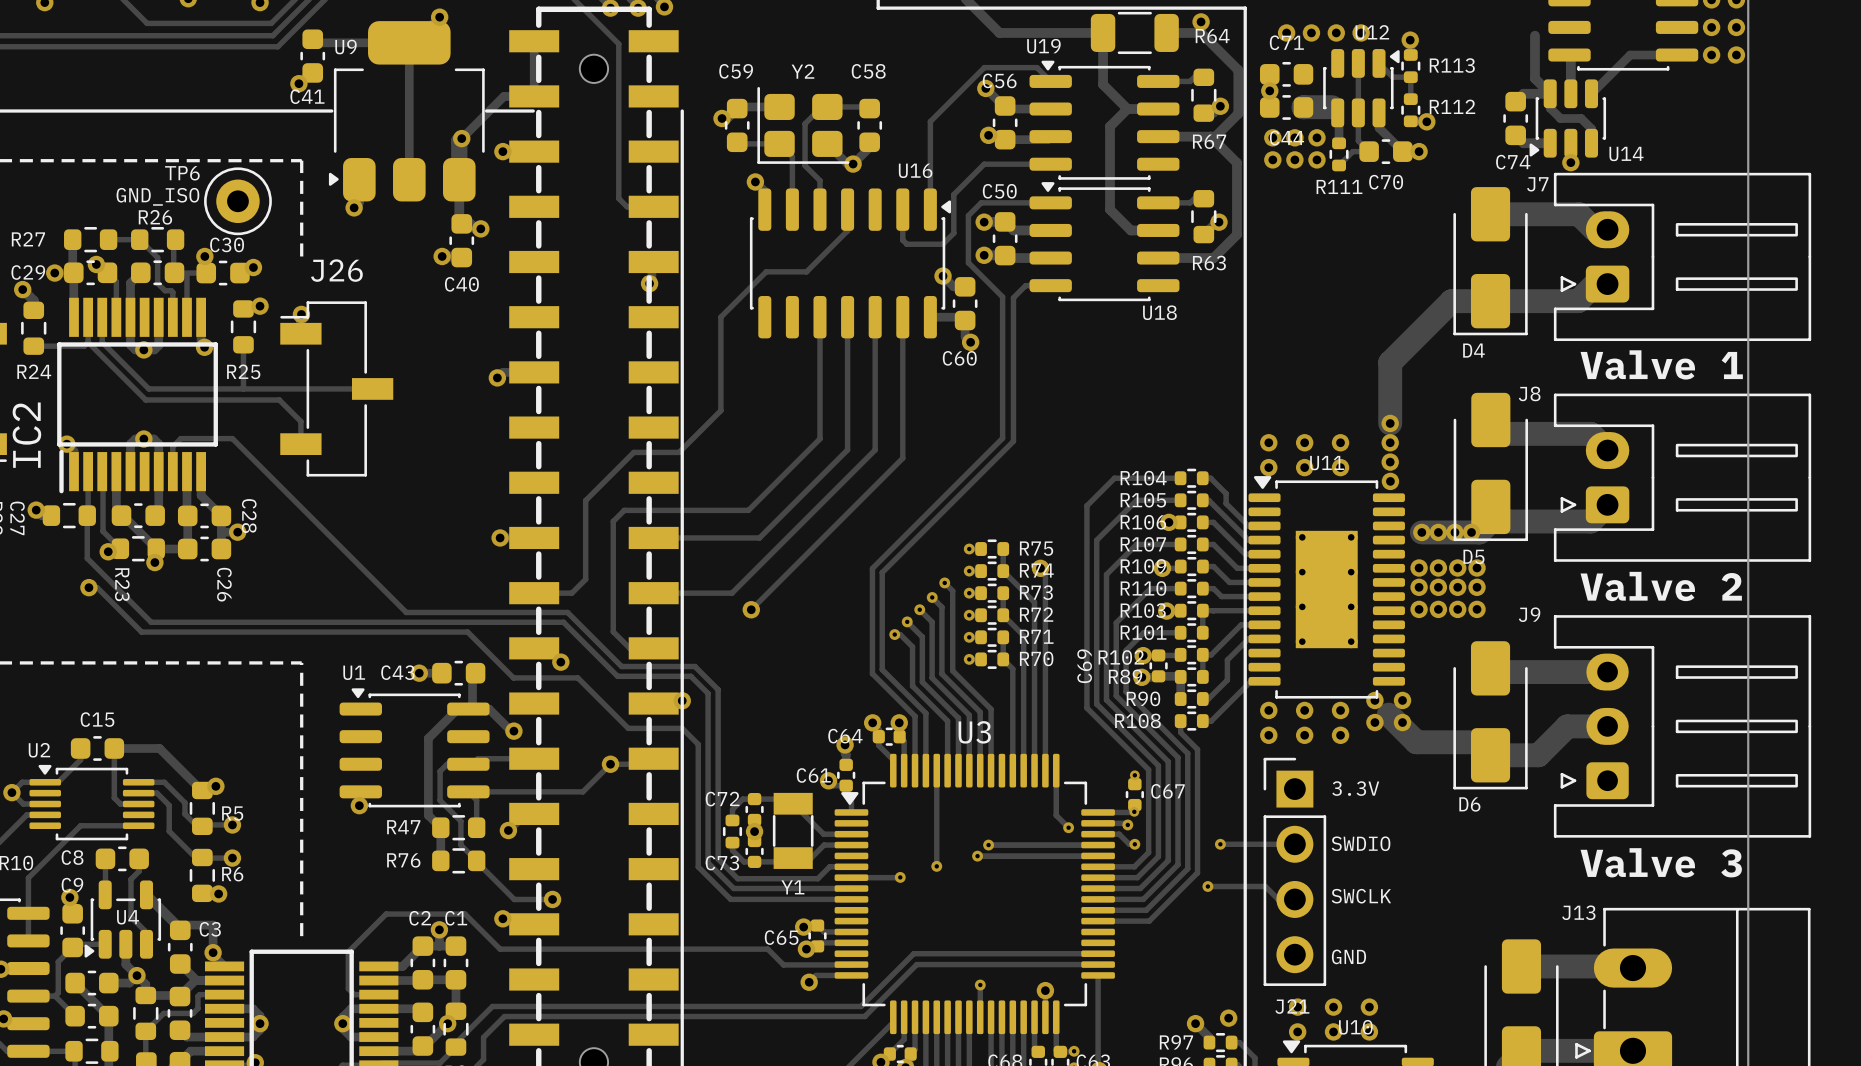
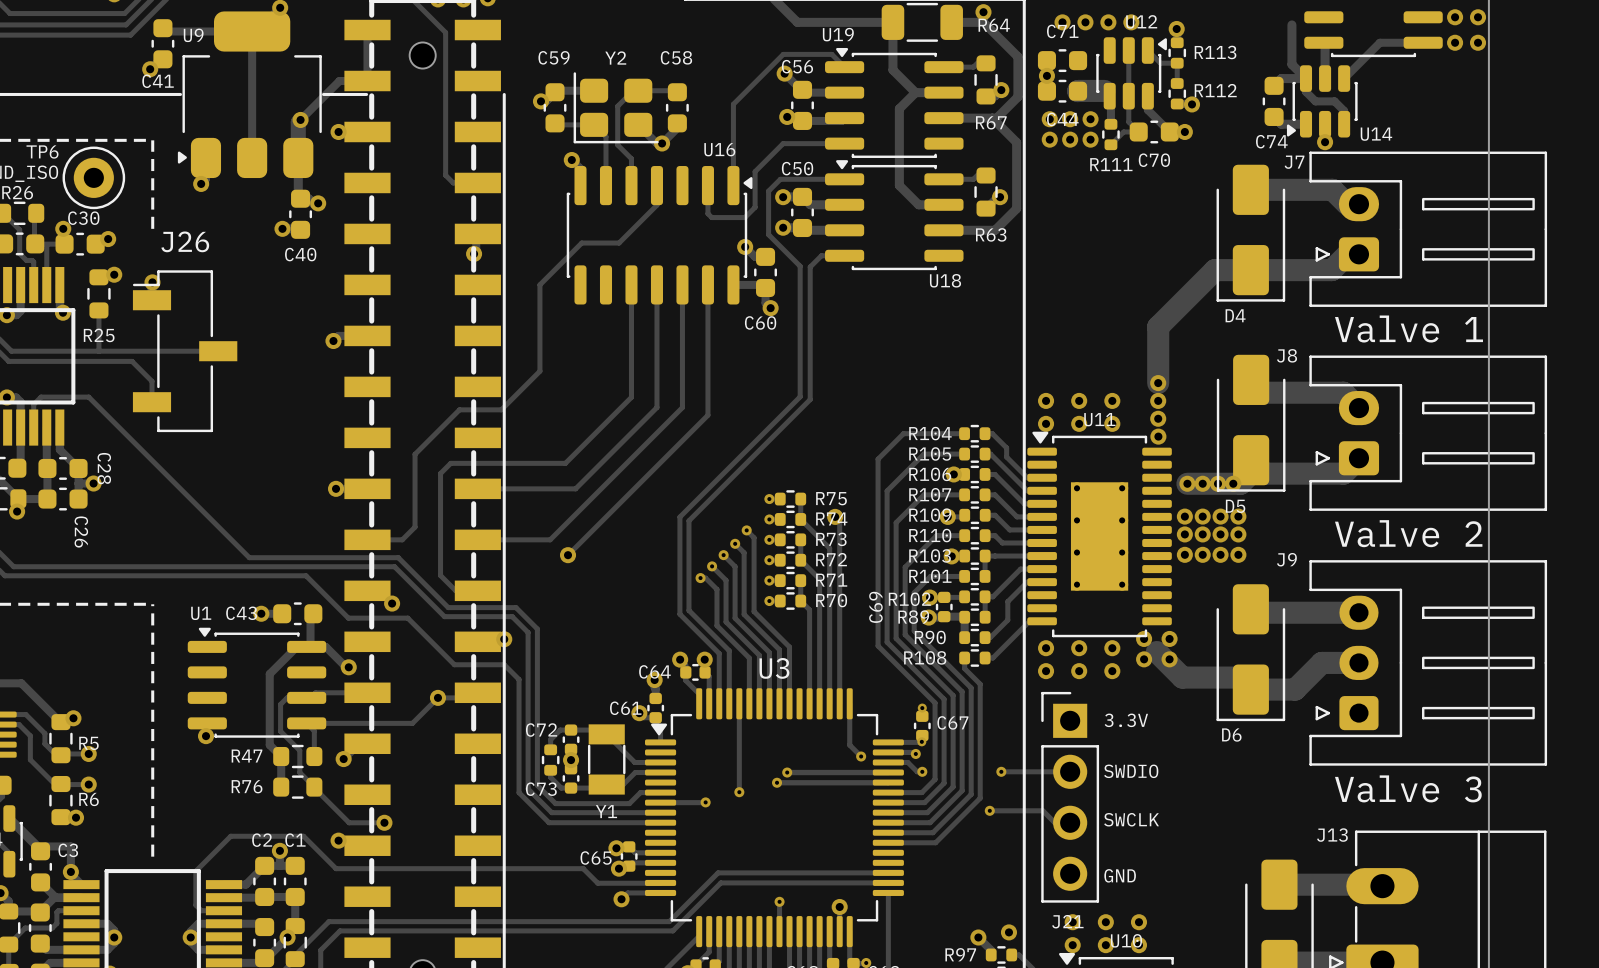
J7 text: none -> Valve 1 (1408, 329)
J7 value: Valve 1 (1661, 364) -> none
J8 text: none -> Valve 2 (1408, 533)
J8 value: Valve 2 (1661, 586) -> none
J9 text: none -> Valve 3 (1408, 788)
J9 value: Valve 3 (1661, 862) -> none

